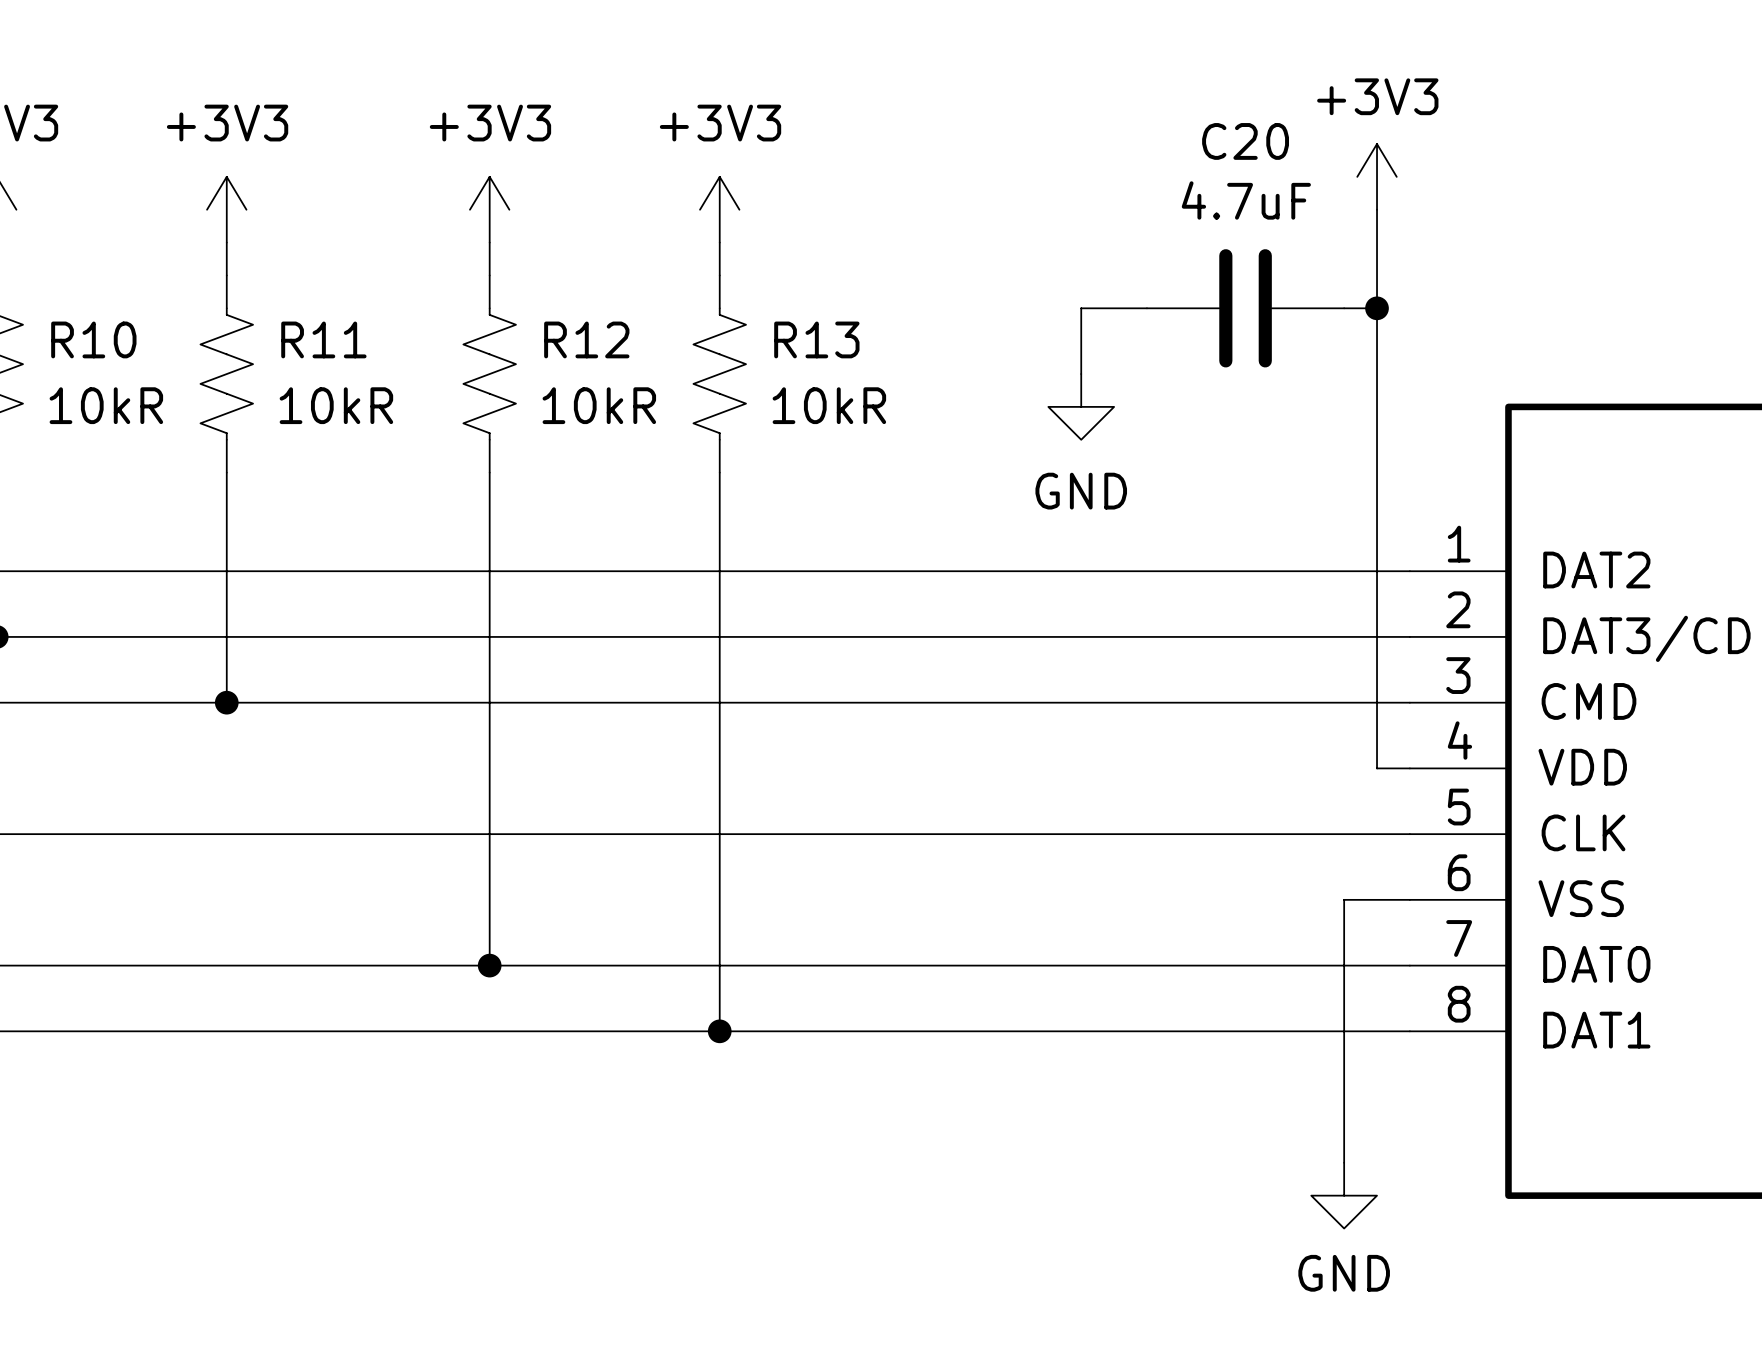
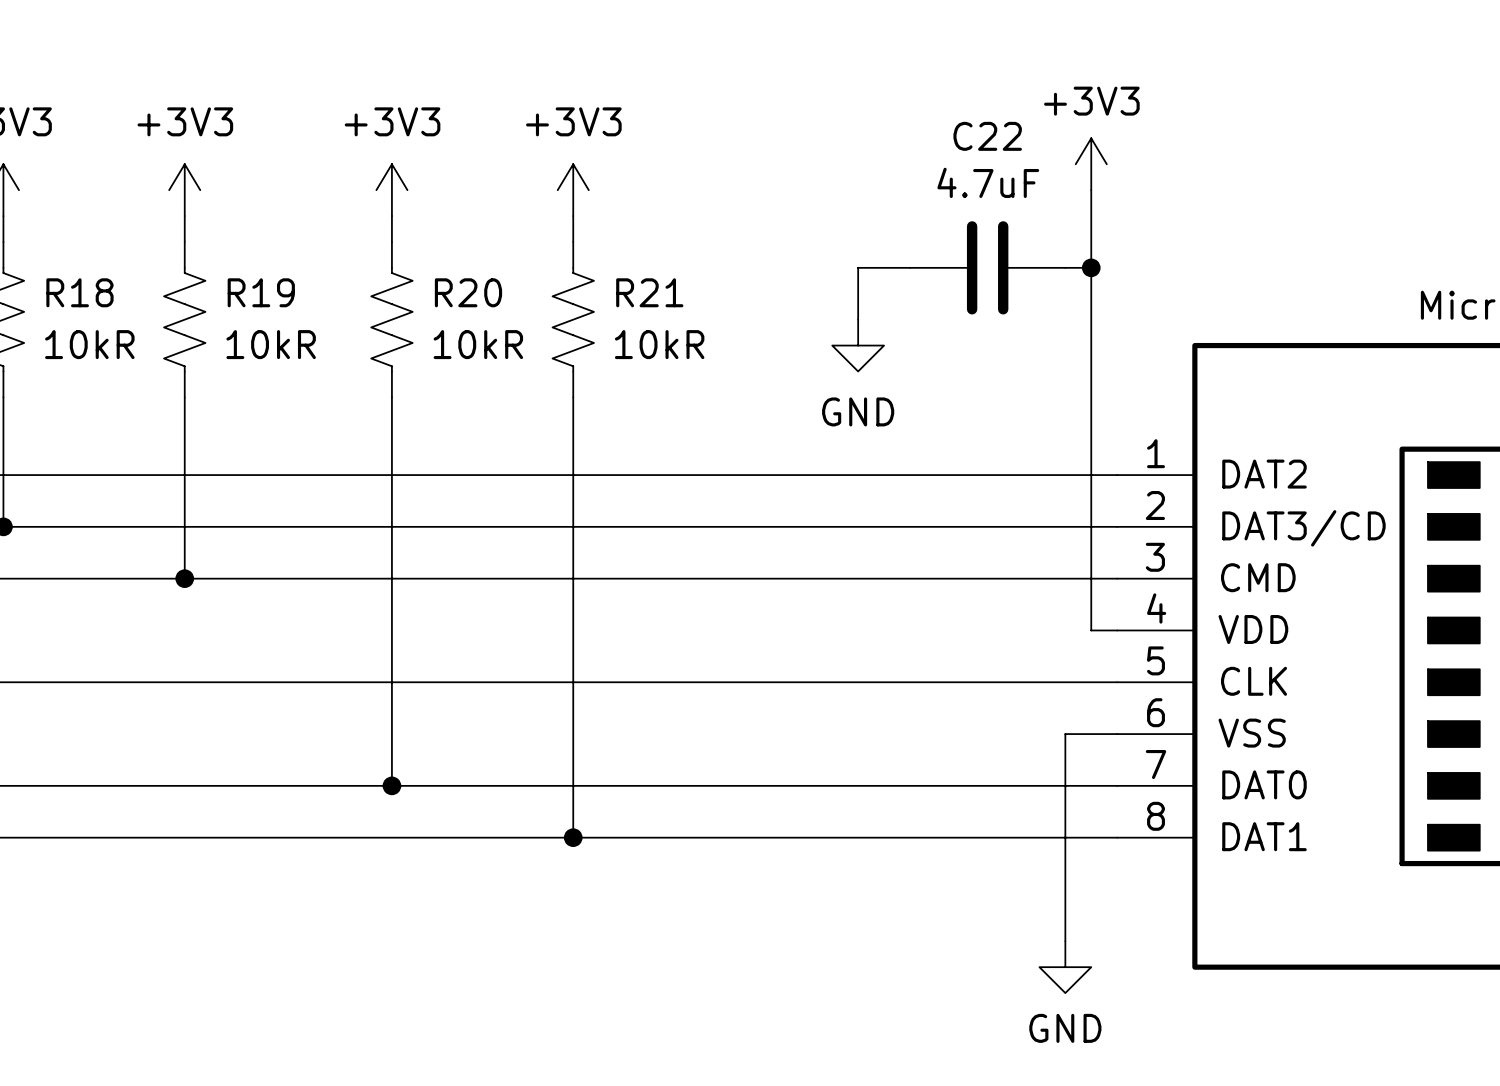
C20 name: C20 (1245, 141) -> C22 (987, 136)
R10 name: R10 (93, 339) -> R18 (79, 292)
R11 name: R11 (323, 339) -> R19 (261, 292)
R12 name: R12 (586, 339) -> R20 (468, 292)
R13 name: R13 (816, 339) -> R21 (649, 292)

